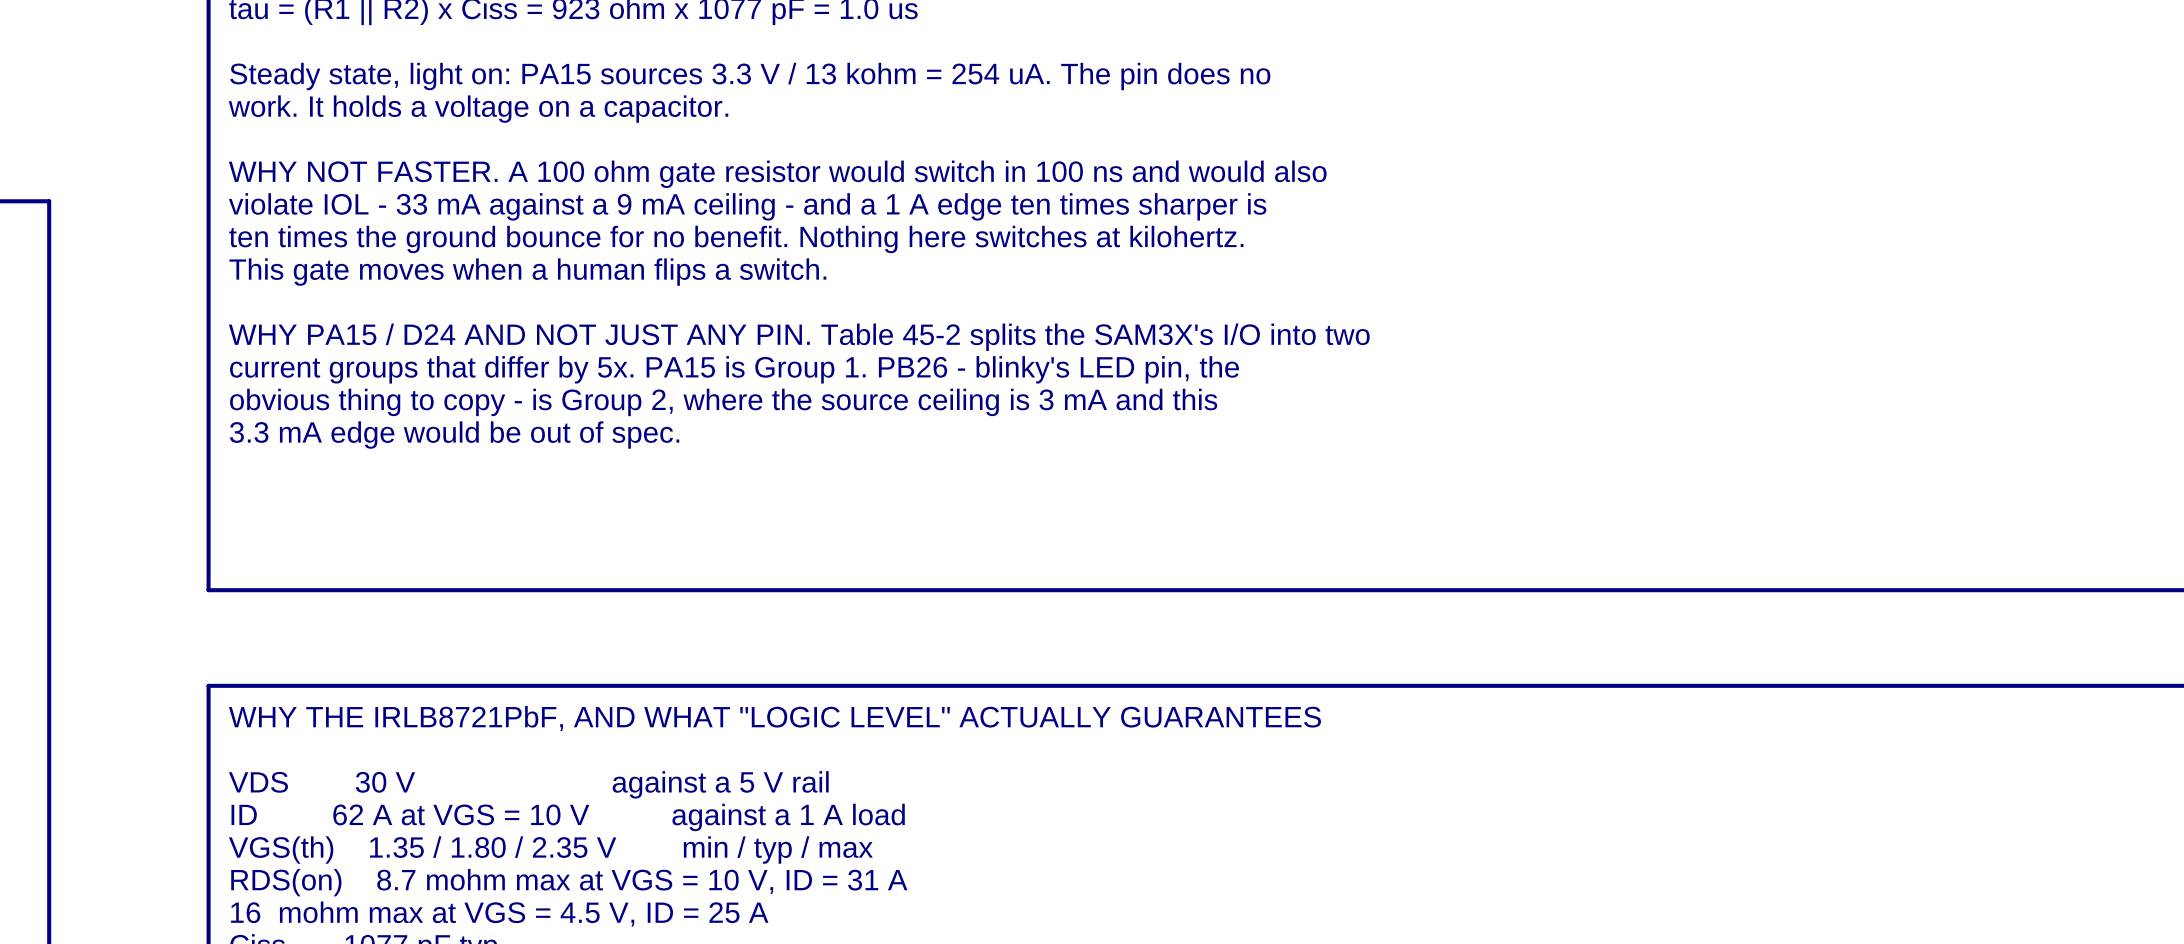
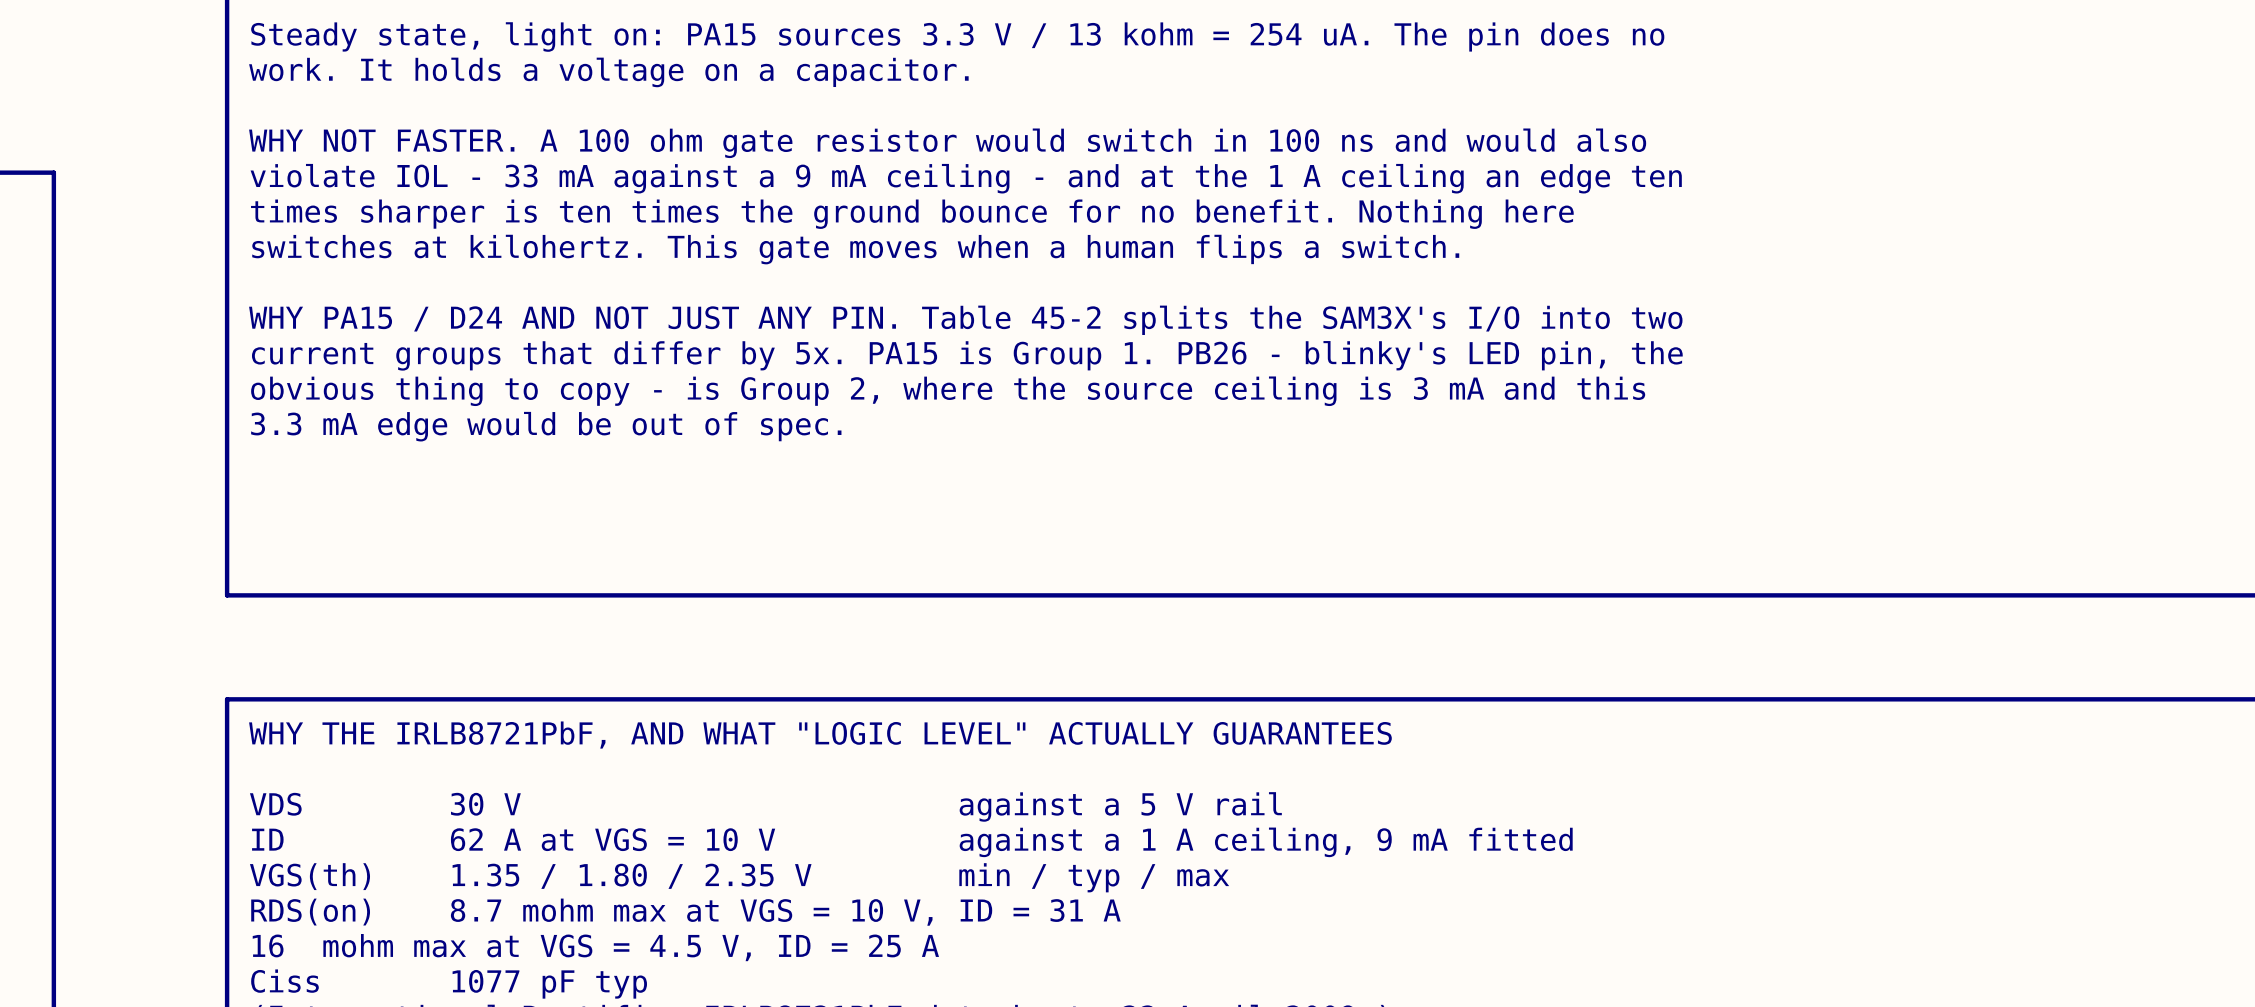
text: violate IOL - 33 mA against a 9 mA ceiling - and a 1 A edge ten times sharper is (747, 206) -> violate IOL - 33 mA against a 9 mA ceiling - and at the 1 A ceiling an edge ten (966, 178)
text: ten times the ground bounce for no benefit. Nothing here switches at kilohertz. (736, 239) -> times sharper is ten times the ground bounce for no benefit. Nothing here (912, 214)
text: This gate moves when a human flips a switch. (527, 272) -> switches at kilohertz. This gate moves when a human flips a switch. (855, 249)
text: ID 62 A at VGS = 10 V against a 1 A load (568, 817) -> ID 62 A at VGS = 10 V against a 1 A ceiling, 9 mA fitted (912, 842)

